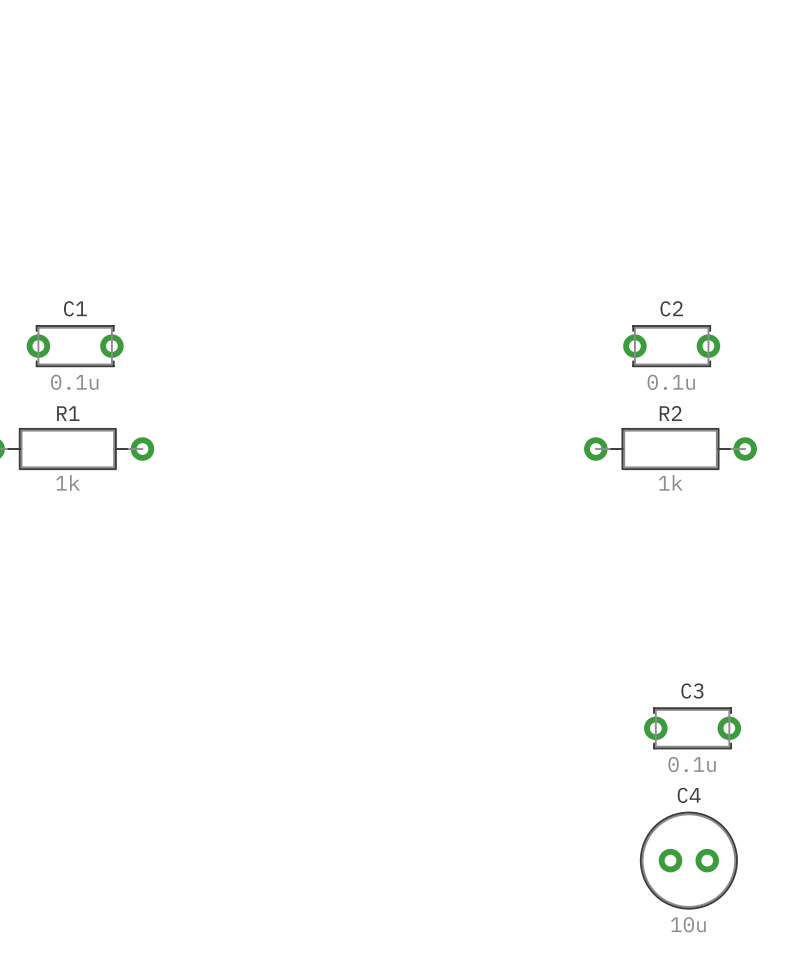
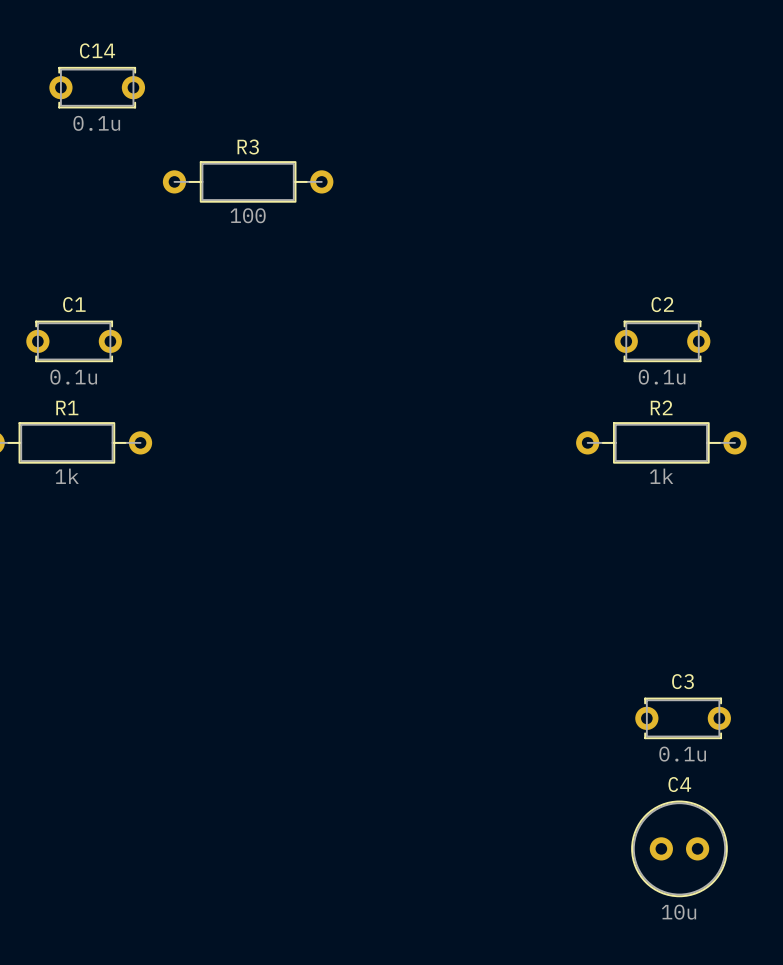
C14: none -> 0.1u (97, 87)
R3: none -> 100 (248, 181)

